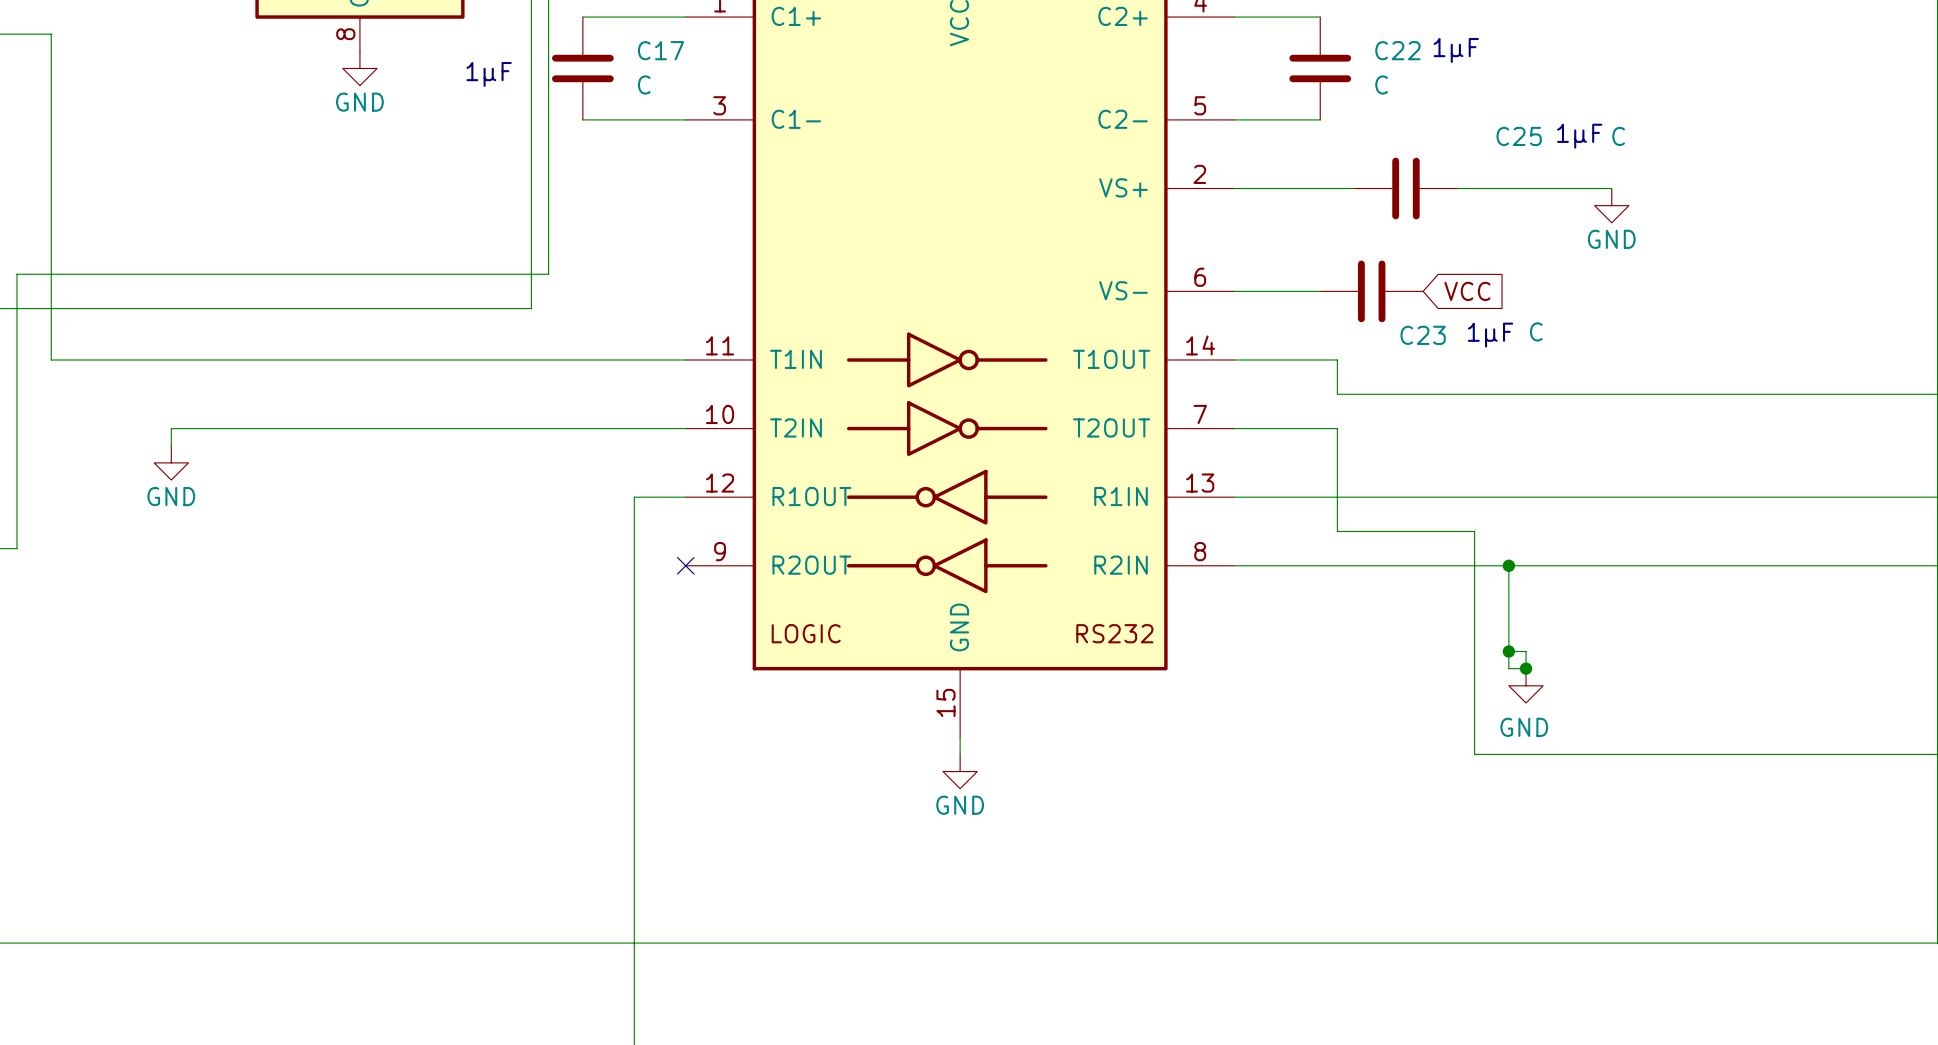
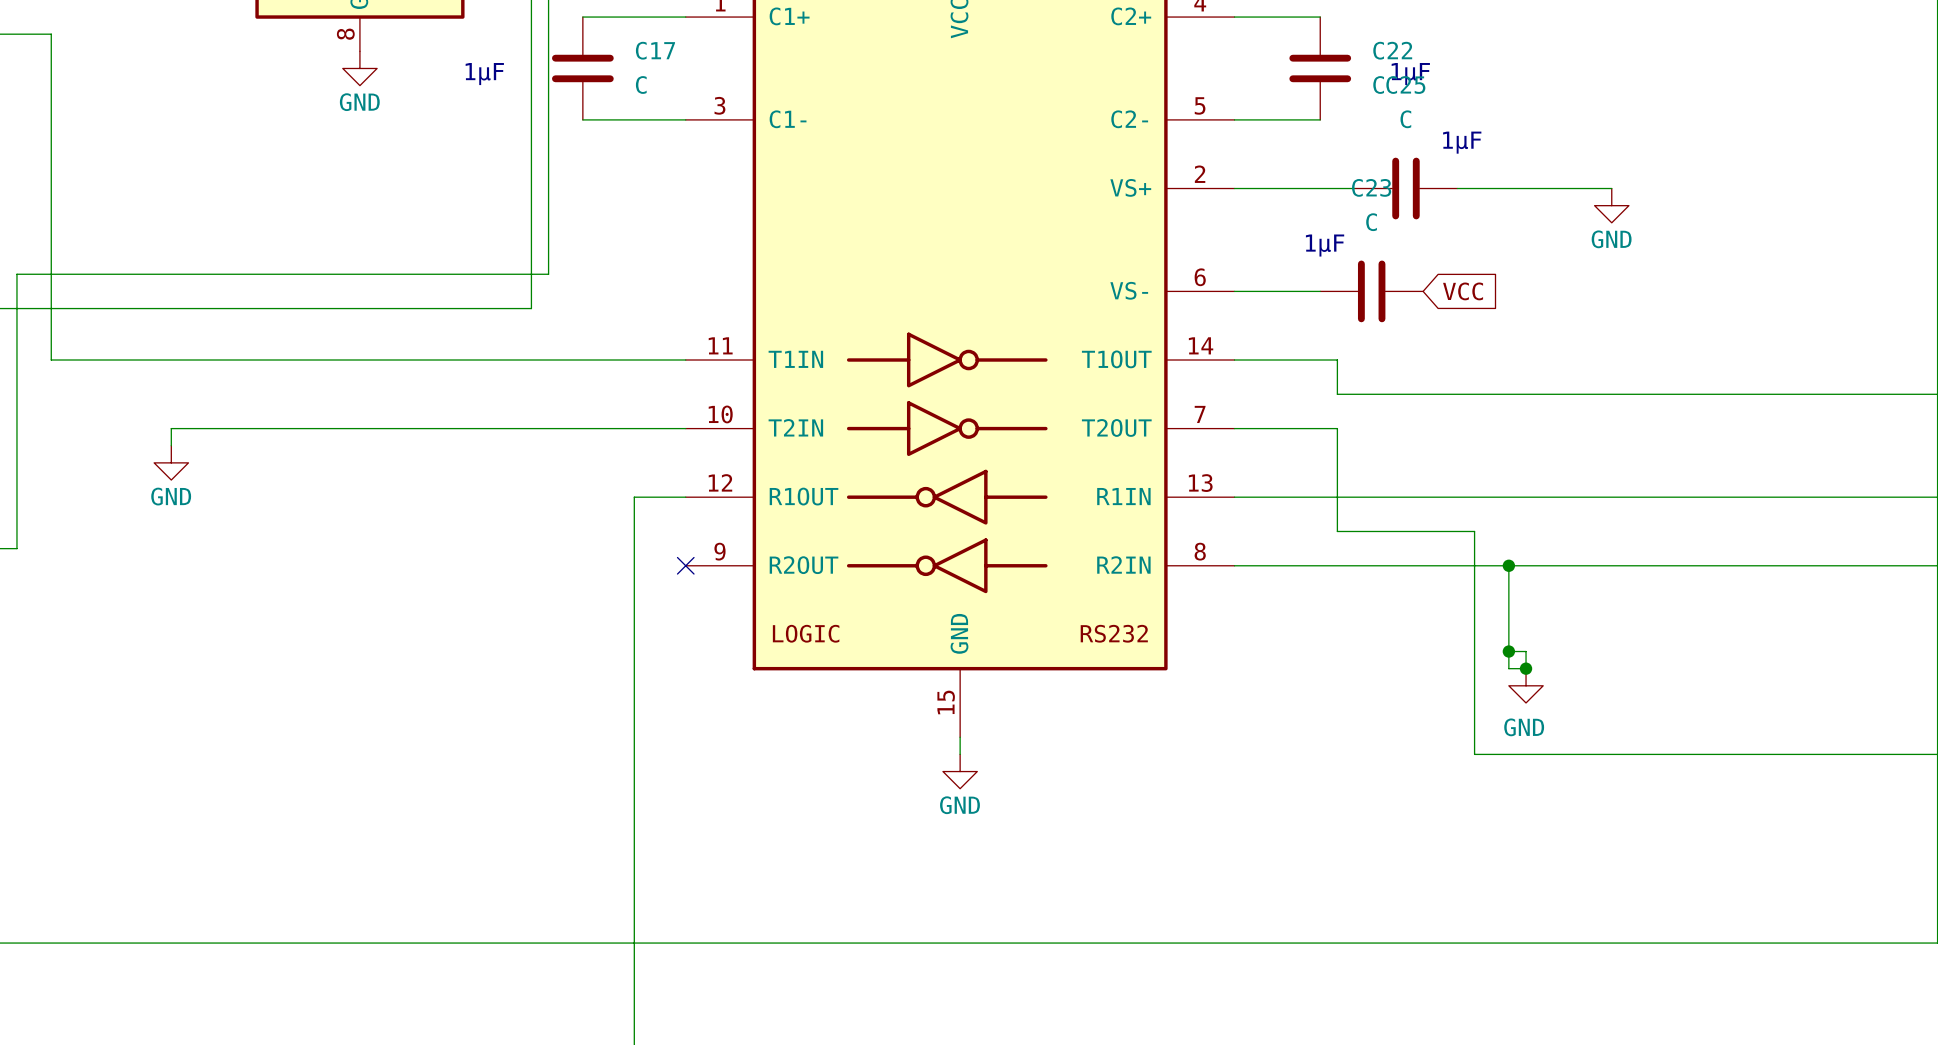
text position: 1µF (1456, 50) -> 1µF (1410, 74)
C25 name position: C25 (1519, 136) -> C25 (1405, 85)
text: 1µF (1579, 136) -> none
C25 value position: C (1618, 136) -> C (1405, 119)
text: none -> 1µF (1462, 142)
text: none -> 1µF (1325, 245)
C23 value position: C (1536, 331) -> C (1371, 222)
C23 name position: C23 (1423, 335) -> C23 (1371, 187)
text: 1µF (1490, 335) -> none

